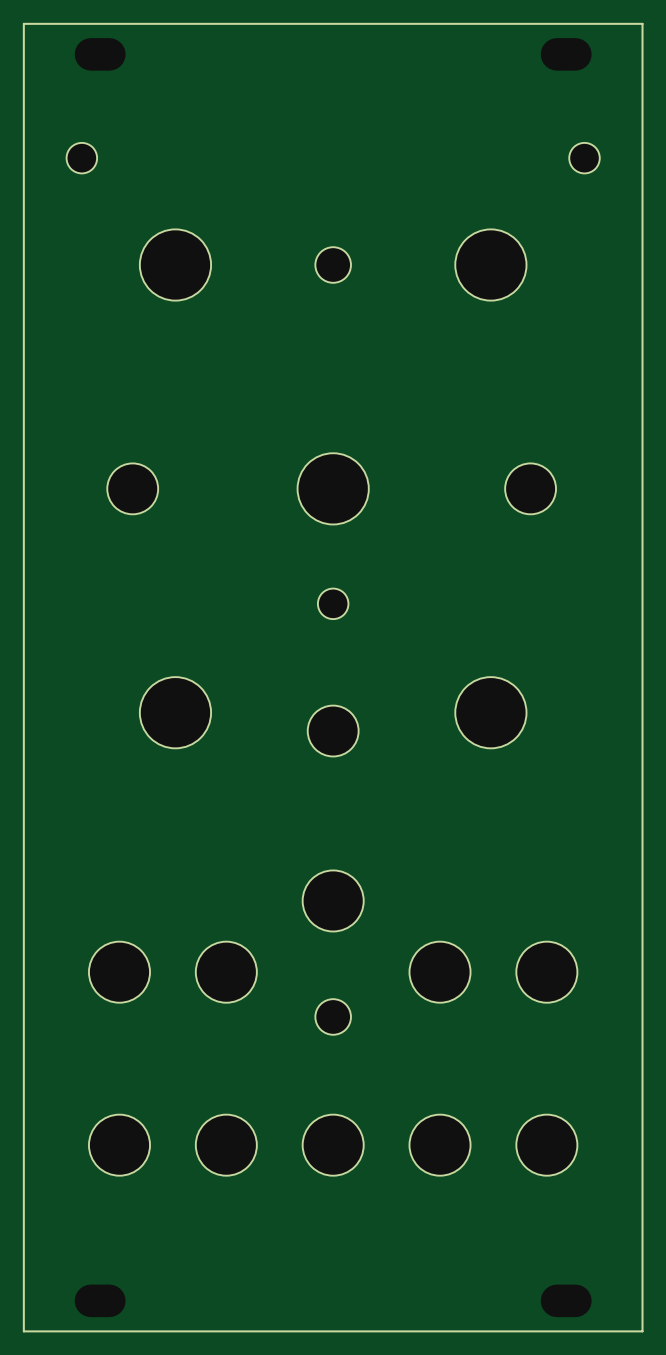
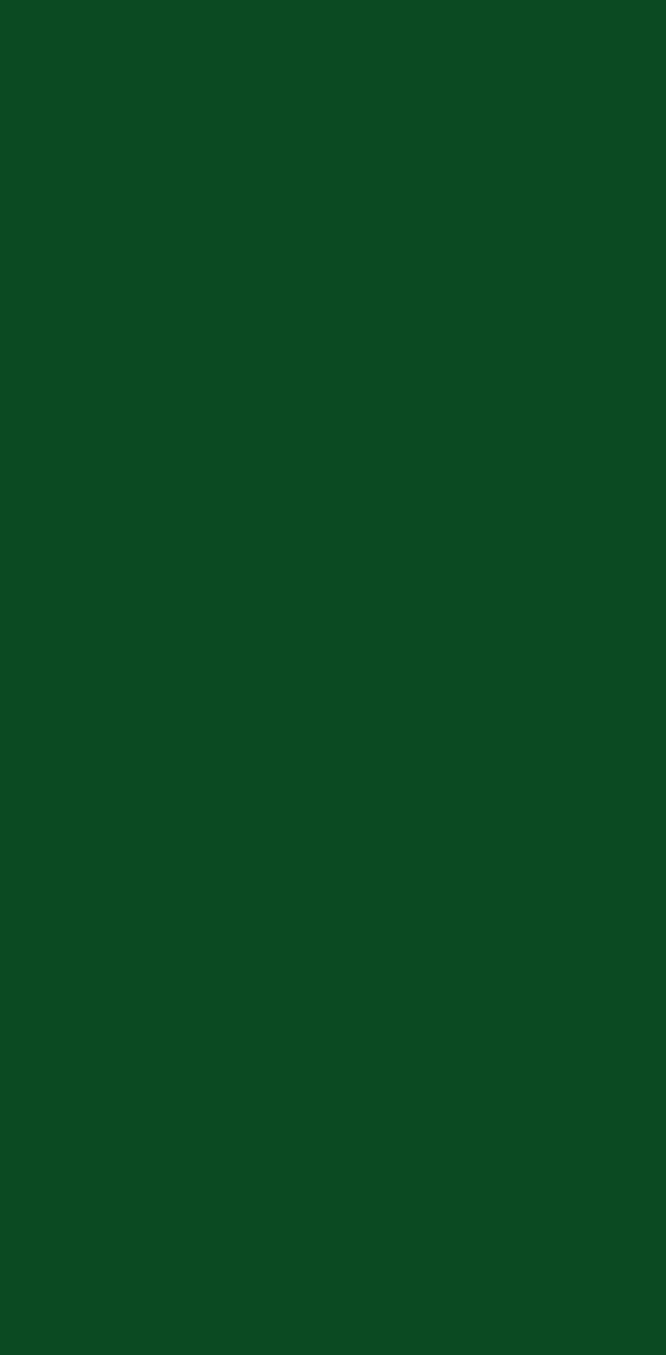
board edge: (642, 23) (23, 23) (23, 1331) (642, 1331) (642, 23) -> none
part: (100, 54) -> none
part: (566, 54) -> none
part: (81, 158) -> none
part: (584, 158) -> none
part: (175, 265) -> none
part: (333, 265) -> none
part: (490, 265) -> none
part: (132, 488) -> none
part: (333, 488) -> none
part: (530, 488) -> none
part: (333, 603) -> none
part: (175, 712) -> none
part: (490, 712) -> none
part: (333, 731) -> none
part: (333, 900) -> none
part: (119, 972) -> none
part: (226, 972) -> none
part: (440, 972) -> none
part: (546, 972) -> none
part: (333, 1016) -> none
part: (119, 1145) -> none
part: (226, 1145) -> none
part: (333, 1145) -> none
part: (440, 1145) -> none
part: (546, 1145) -> none
part: (100, 1300) -> none
part: (566, 1300) -> none

